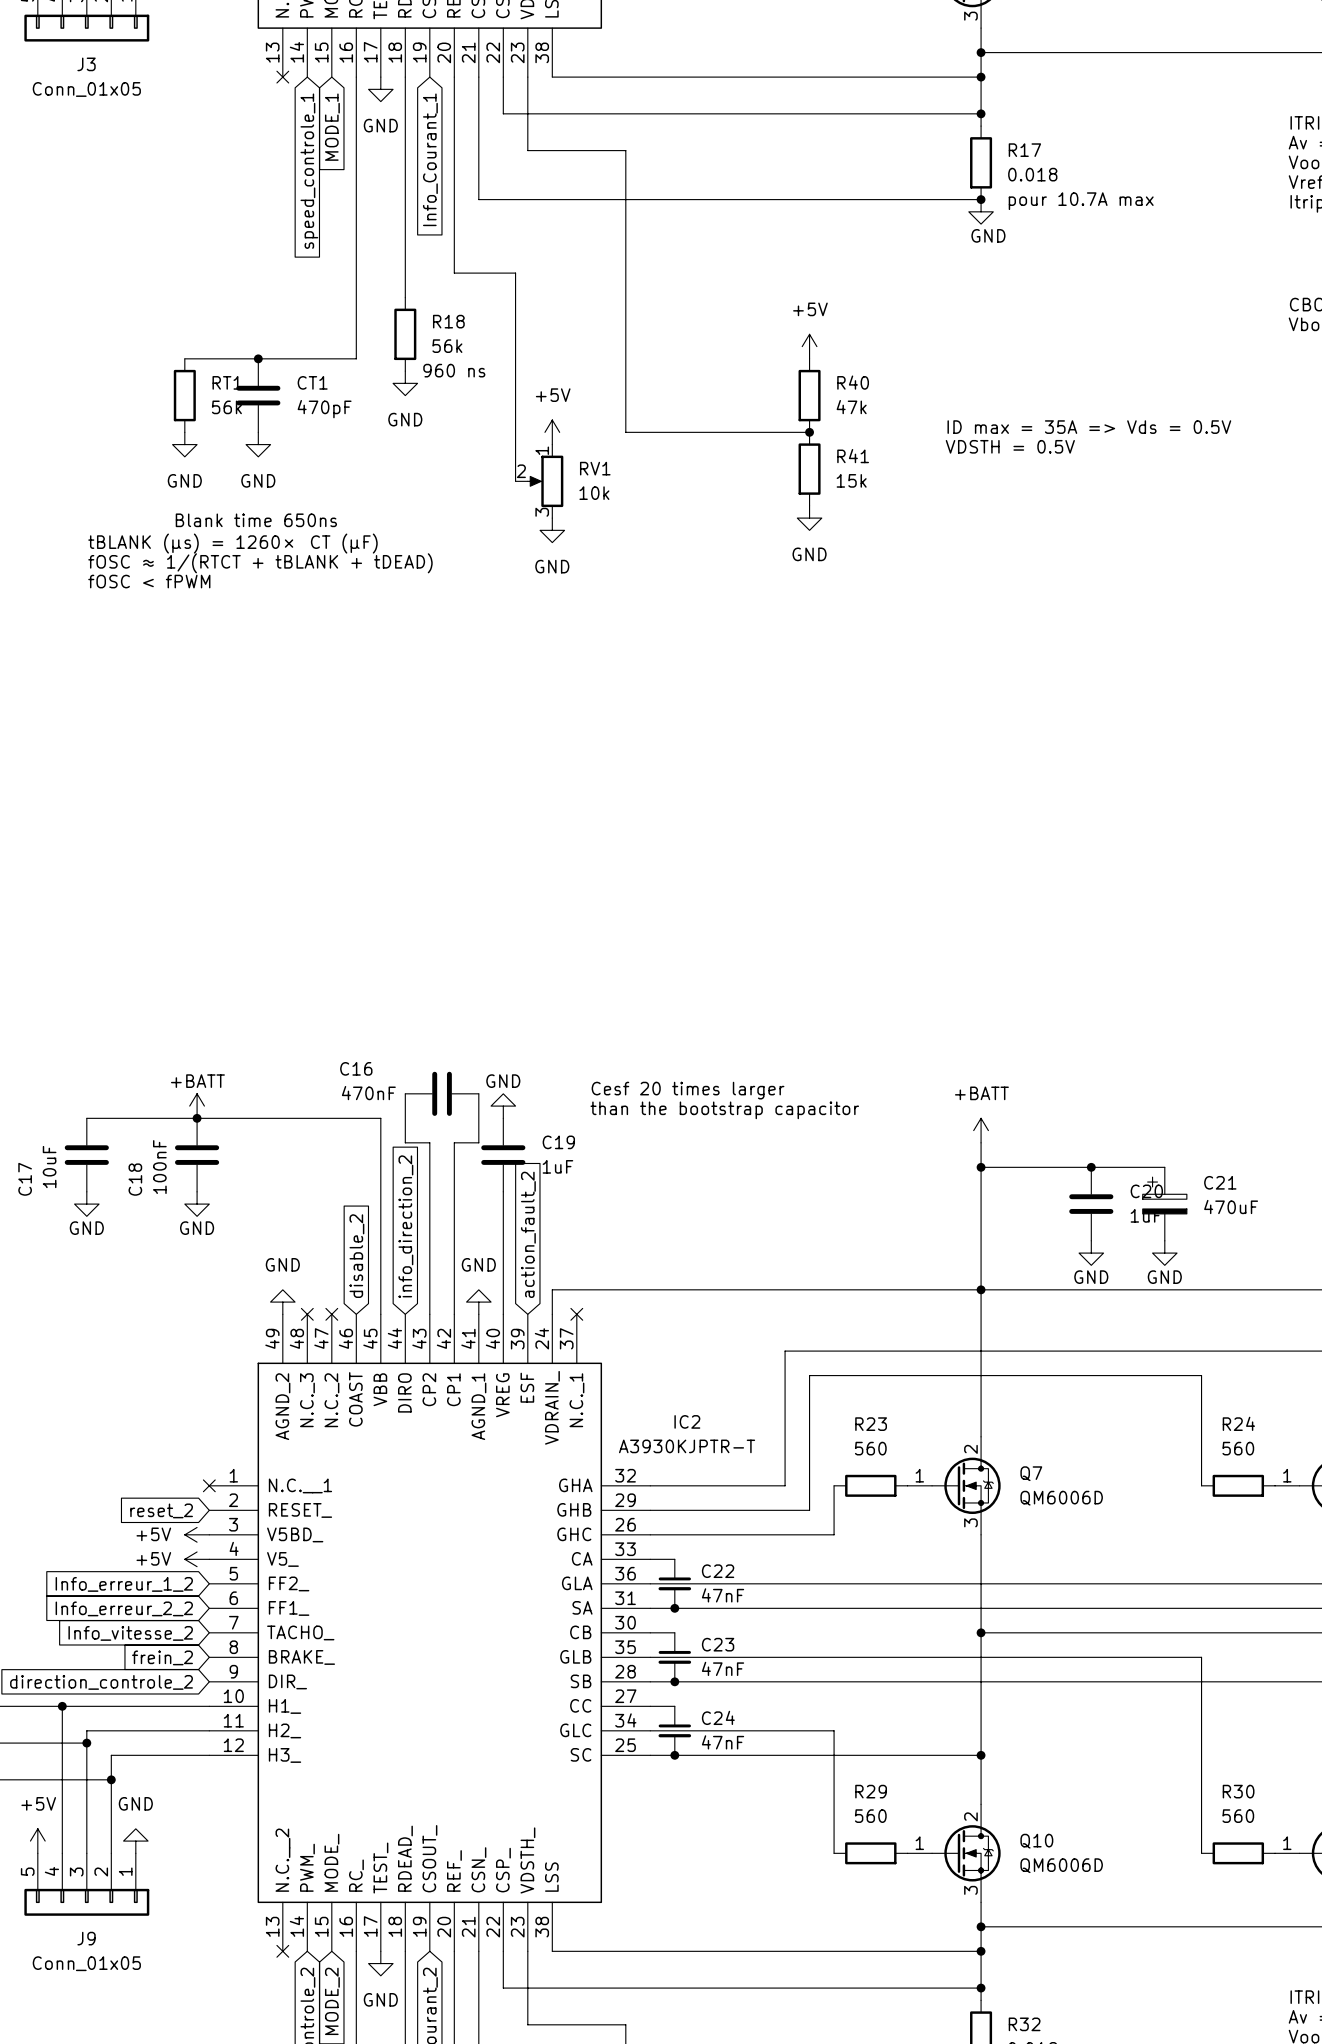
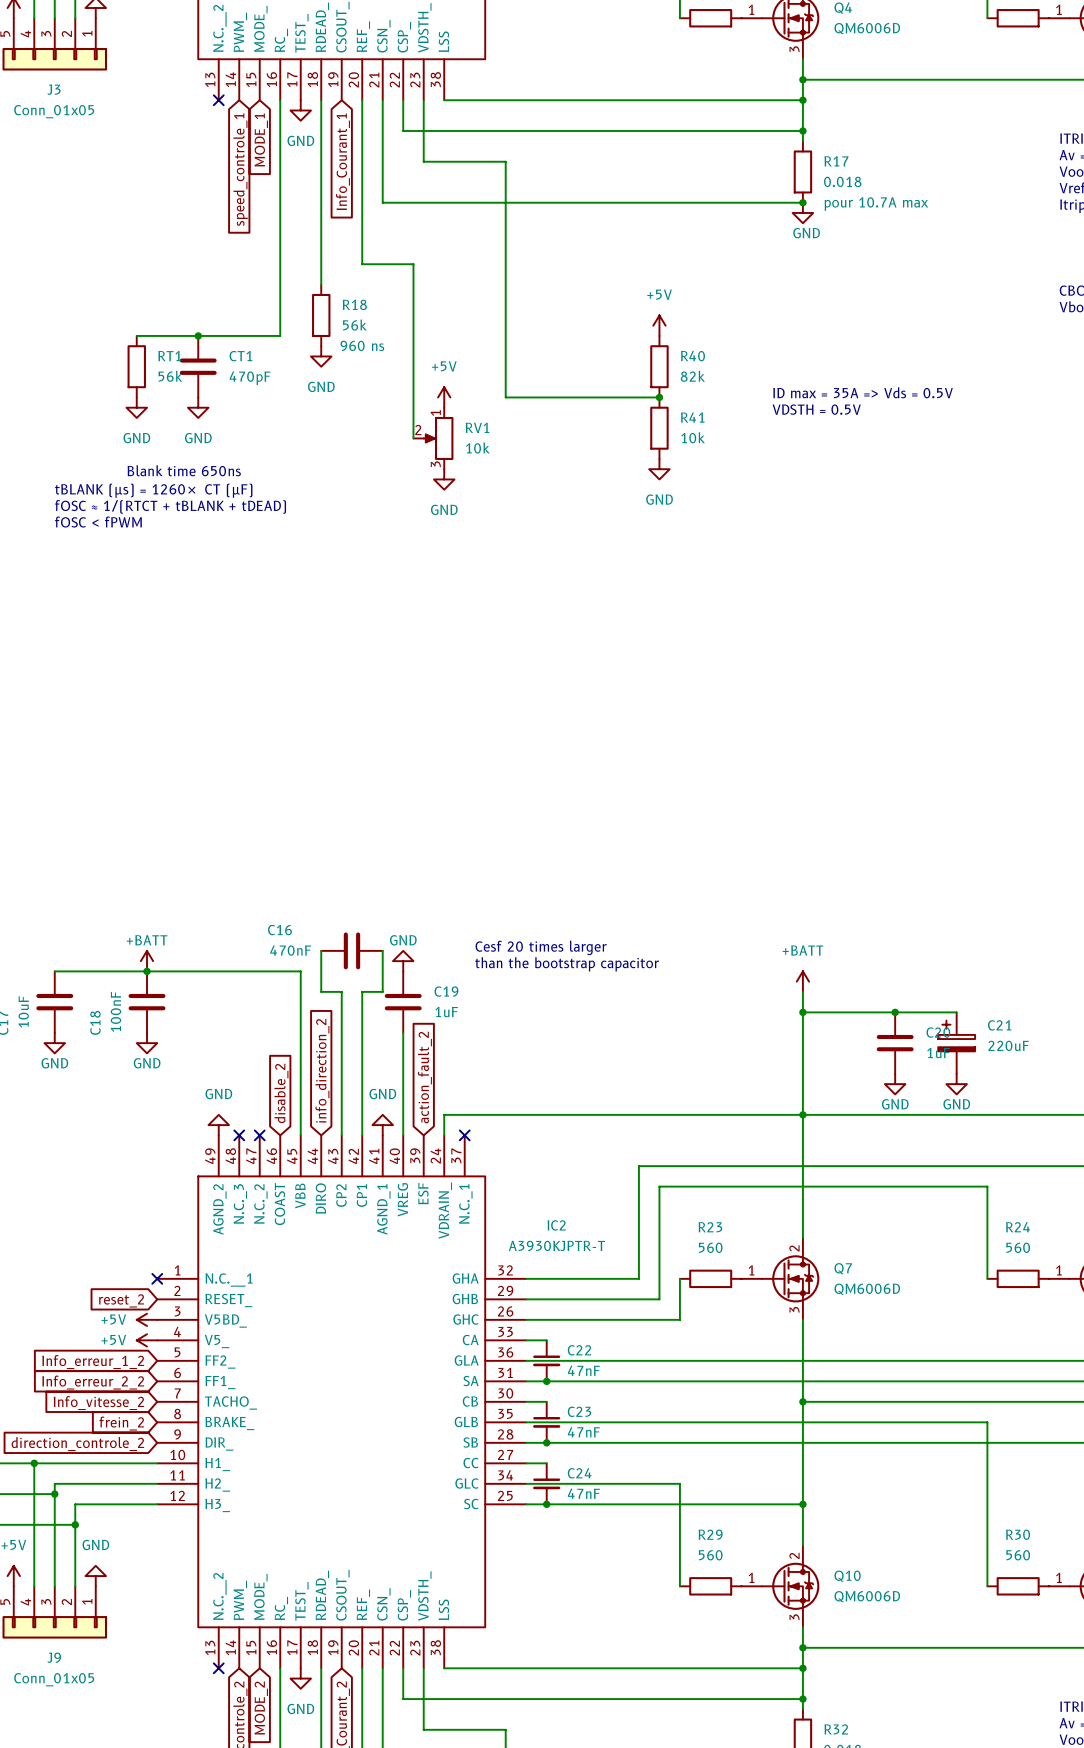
R40 value: 47k (851, 407) -> 82k (692, 376)
R41 value: 15k (851, 480) -> 10k (693, 437)
C21 value: 470uF (1231, 1207) -> 220uF (1008, 1045)

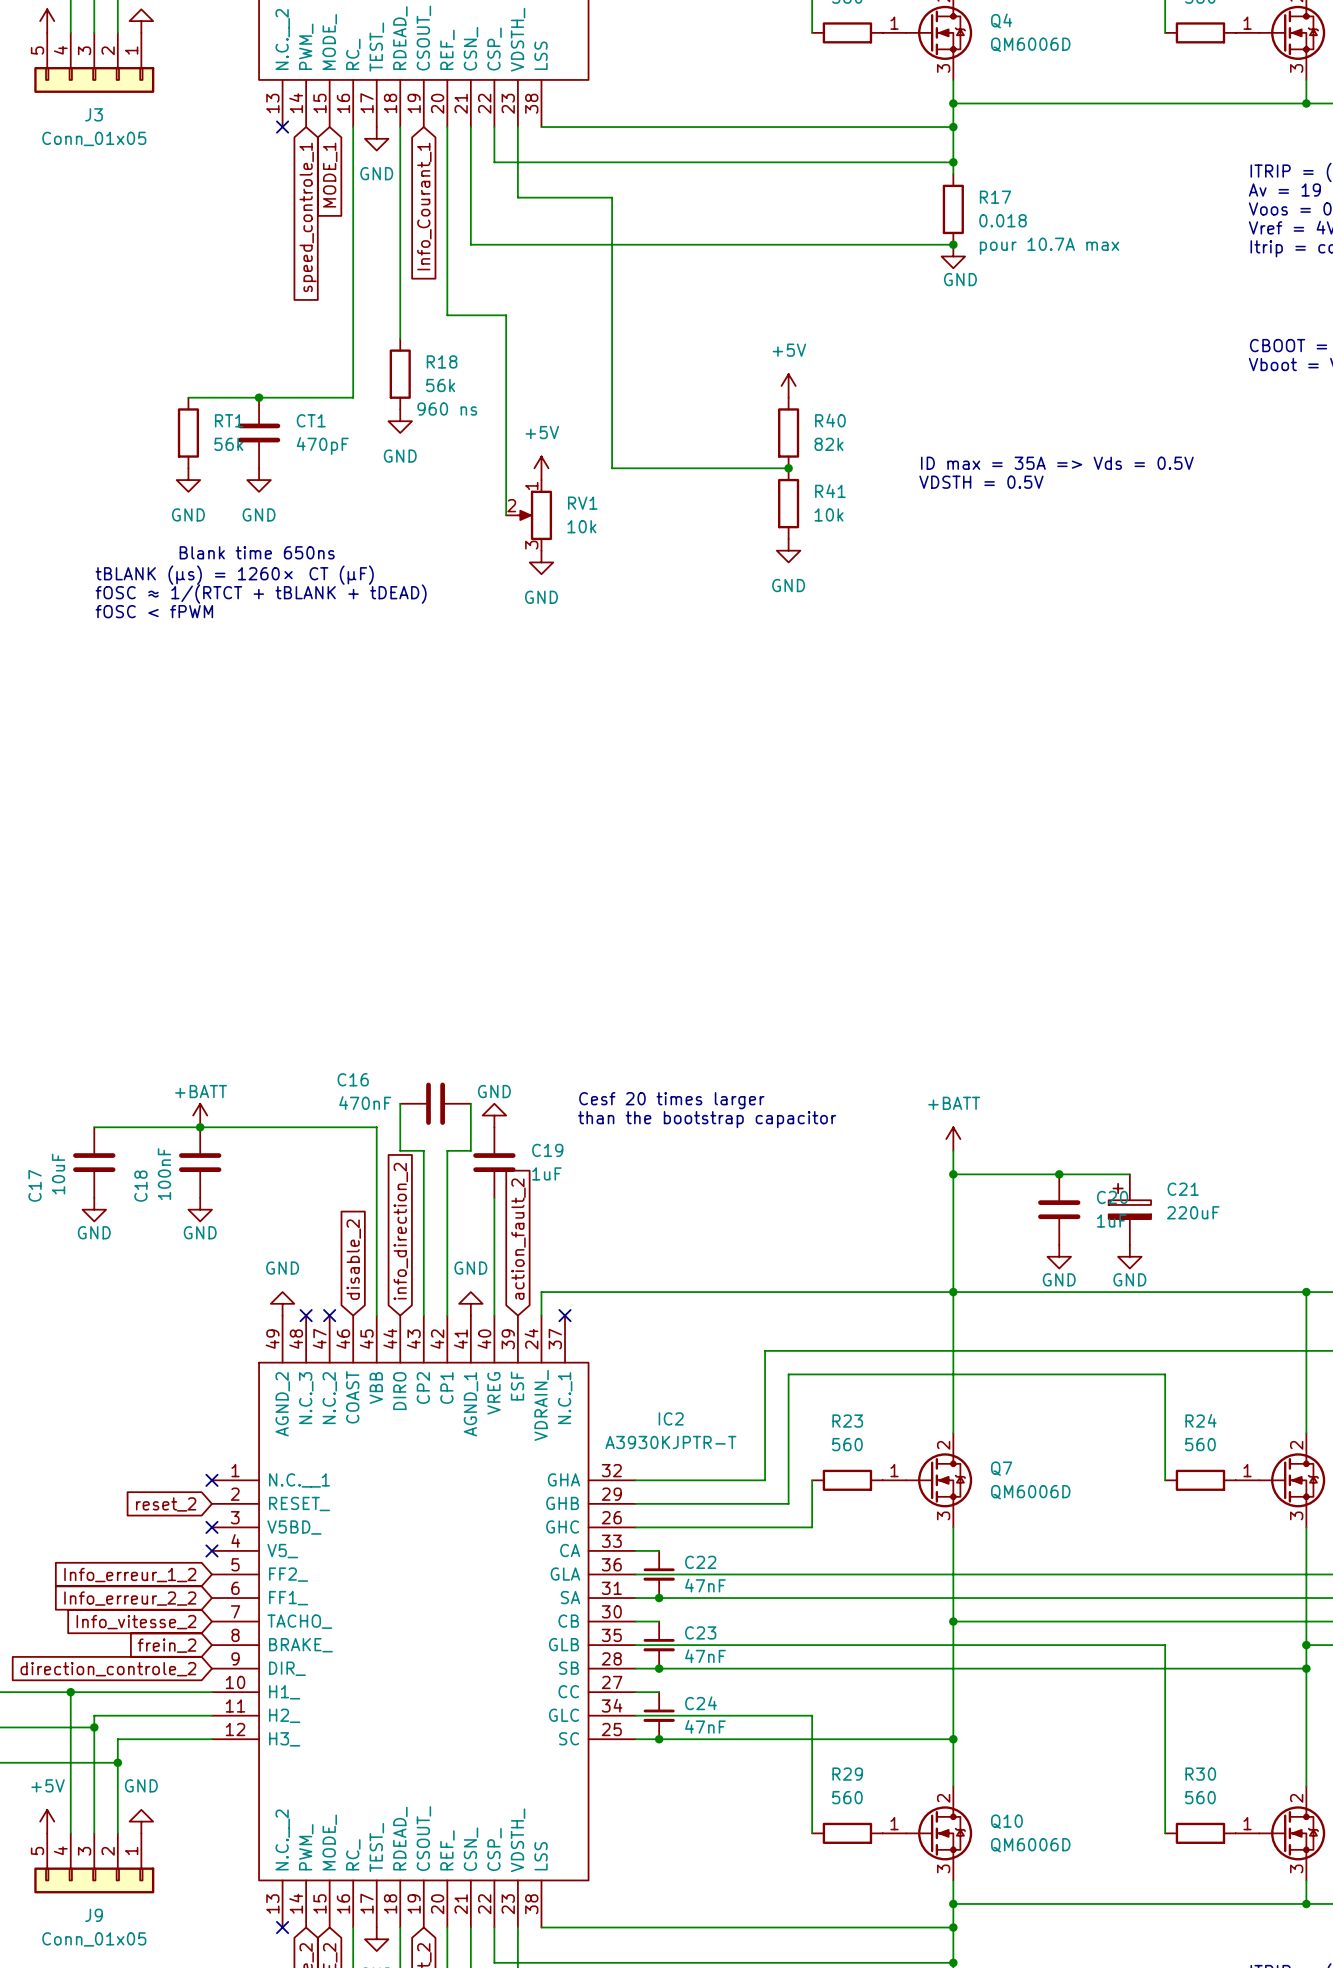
power symbol: +5V (147, 1319) -> none
no-connect mark: none -> (211, 1527)
power symbol: +5V (147, 1340) -> none
no-connect mark: none -> (211, 1550)

